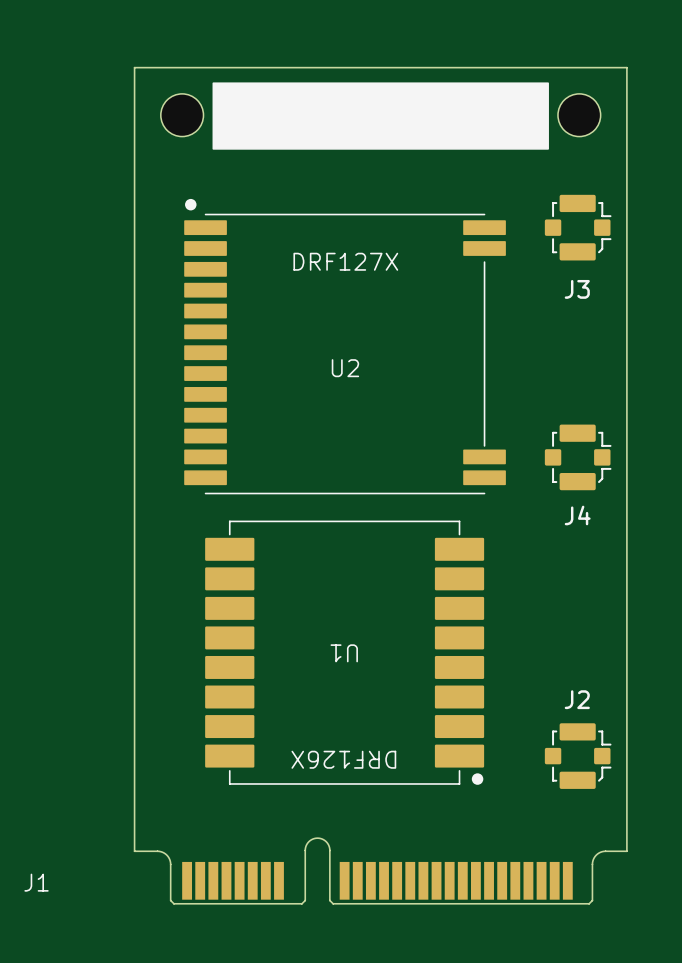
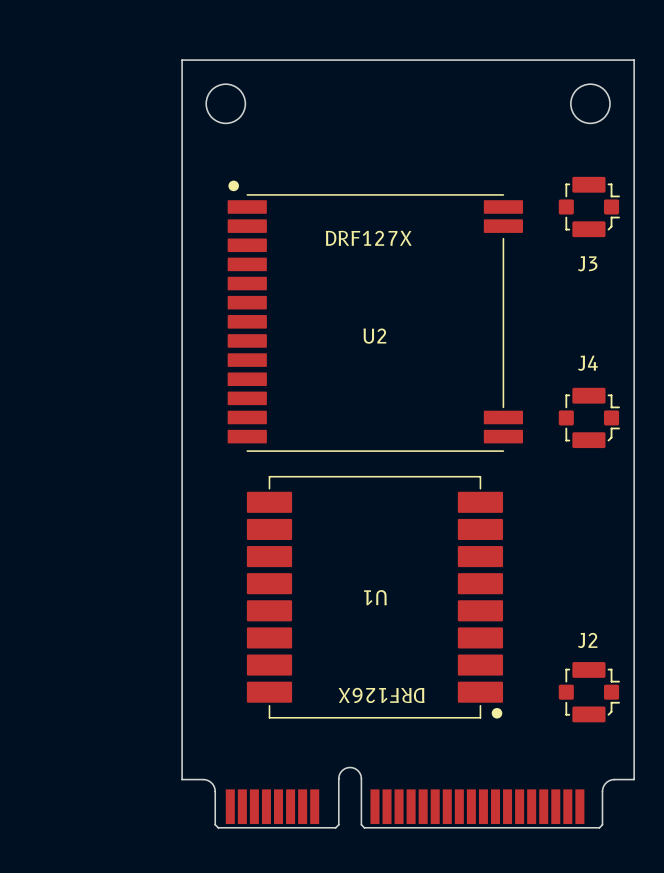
drawing: [212, 82, 549, 150] -> none
J4 name position: J4 (577, 515) -> J4 (587, 363)
J1 name: J1 (36, 882) -> none

